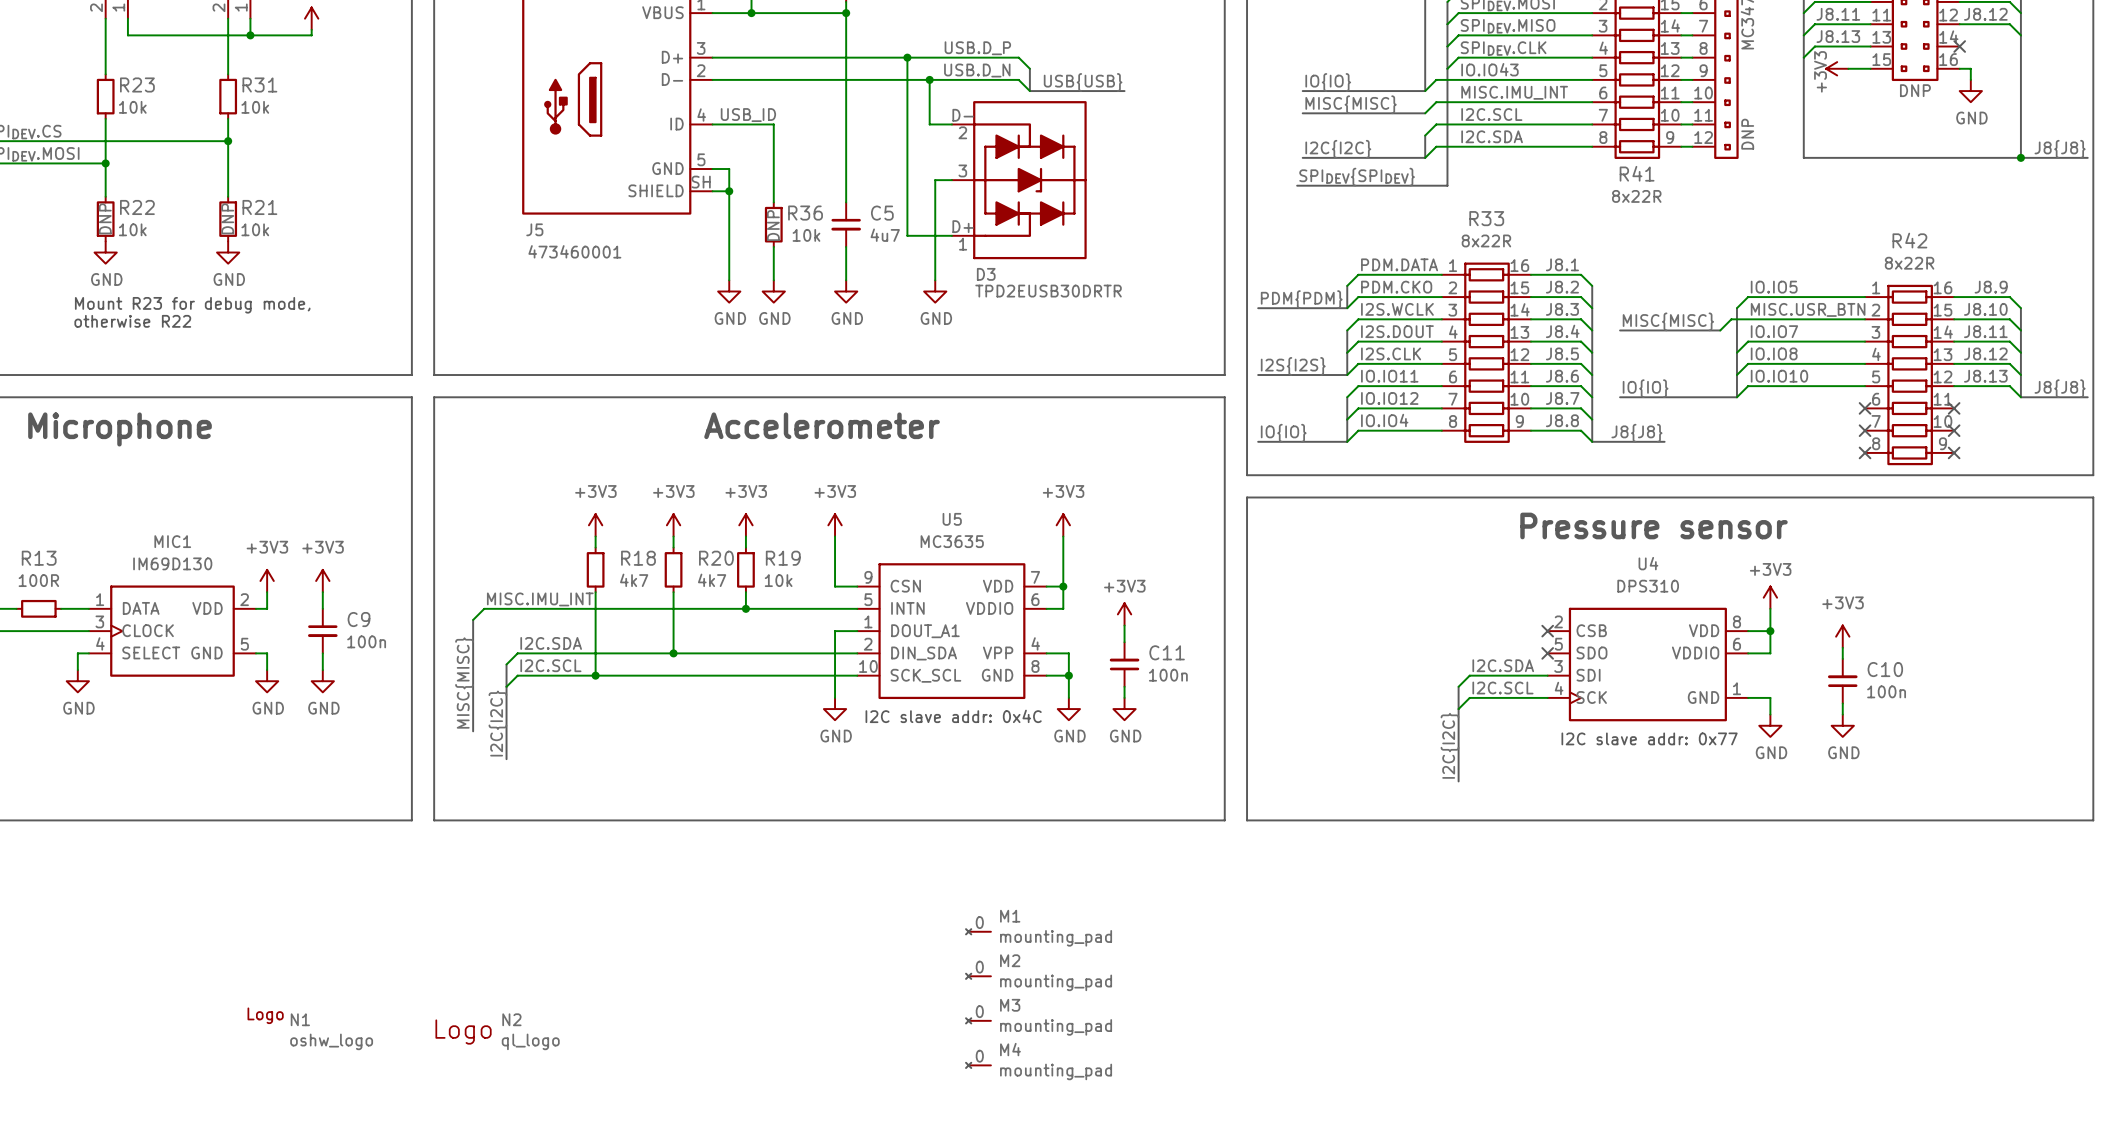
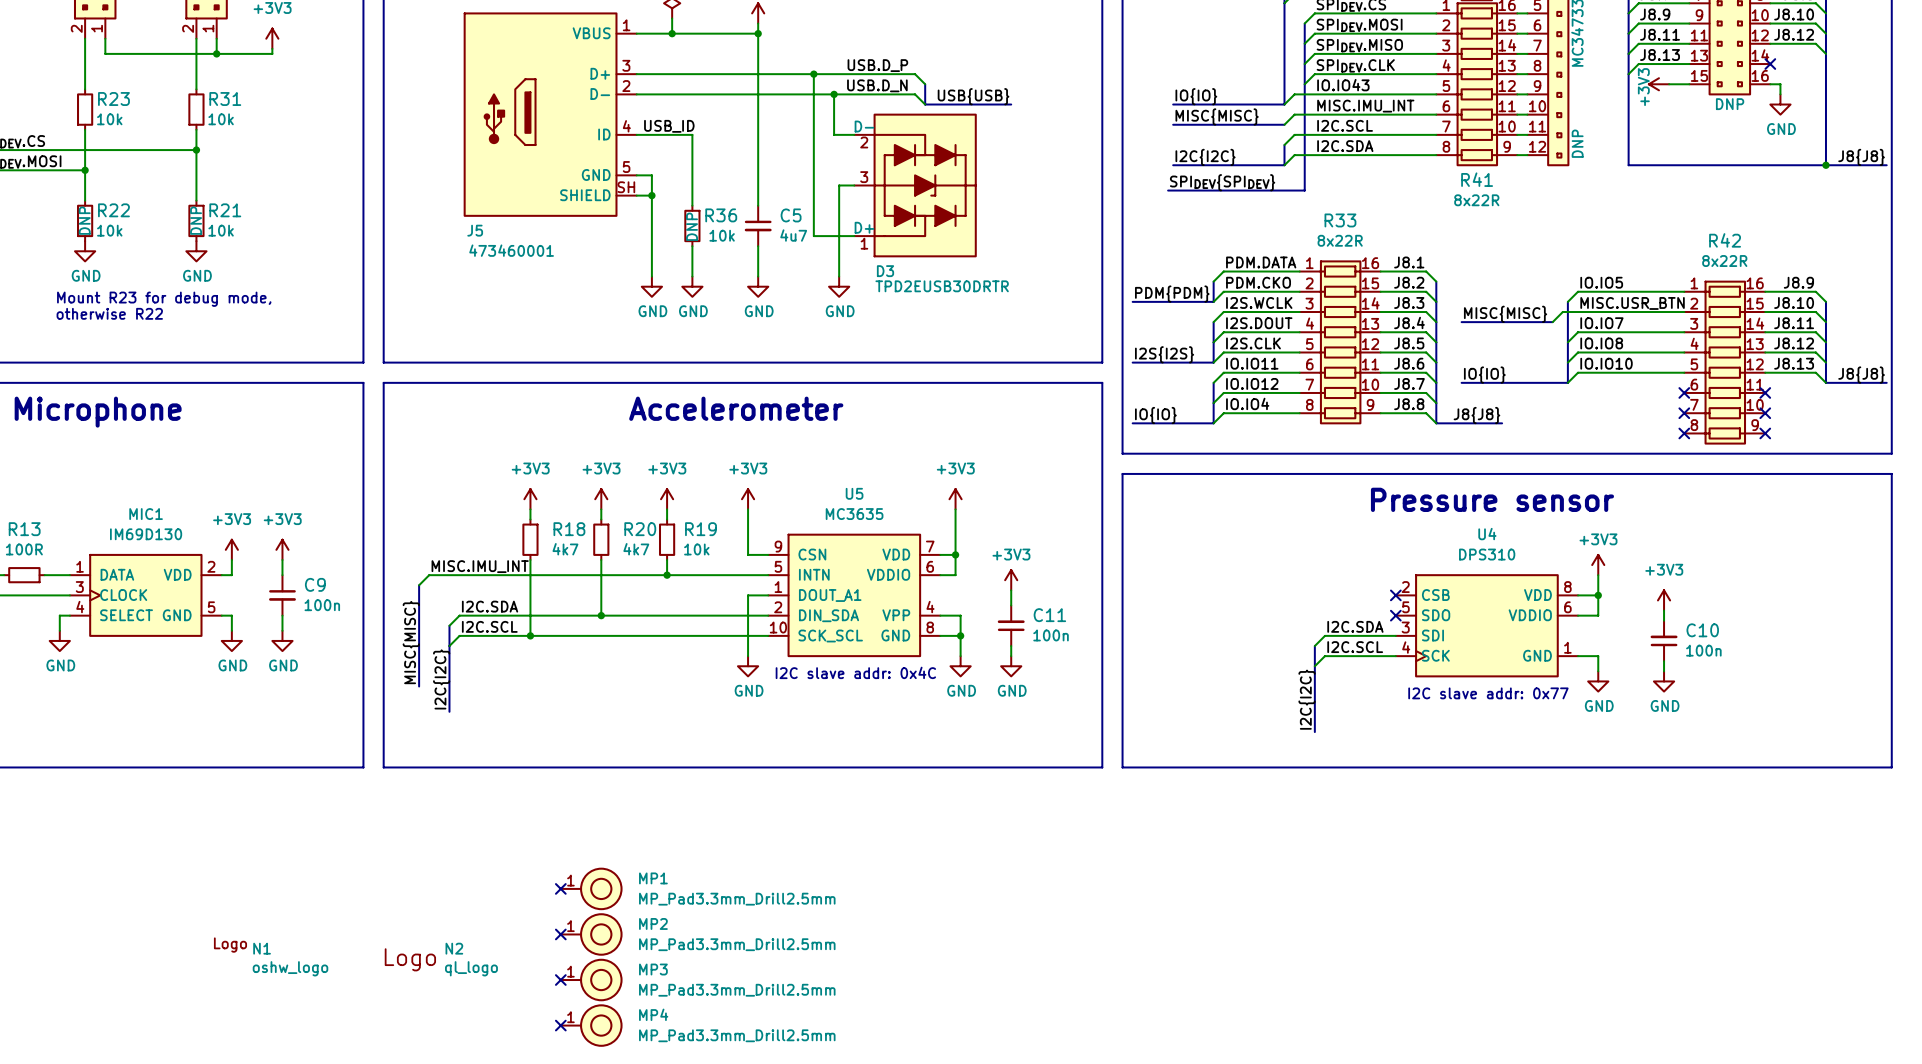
M1: mounting_pad (978, 931) -> none
no-connect mark: none -> (560, 888)
MP1: none -> MP_Pad3.3mm_Drill2.5mm (591, 888)
M2: mounting_pad (978, 976) -> none
no-connect mark: none -> (560, 934)
MP2: none -> MP_Pad3.3mm_Drill2.5mm (591, 934)
M3: mounting_pad (978, 1020) -> none
no-connect mark: none -> (560, 980)
MP3: none -> MP_Pad3.3mm_Drill2.5mm (591, 980)
M4: mounting_pad (978, 1065) -> none
no-connect mark: none -> (560, 1025)
MP4: none -> MP_Pad3.3mm_Drill2.5mm (591, 1025)

